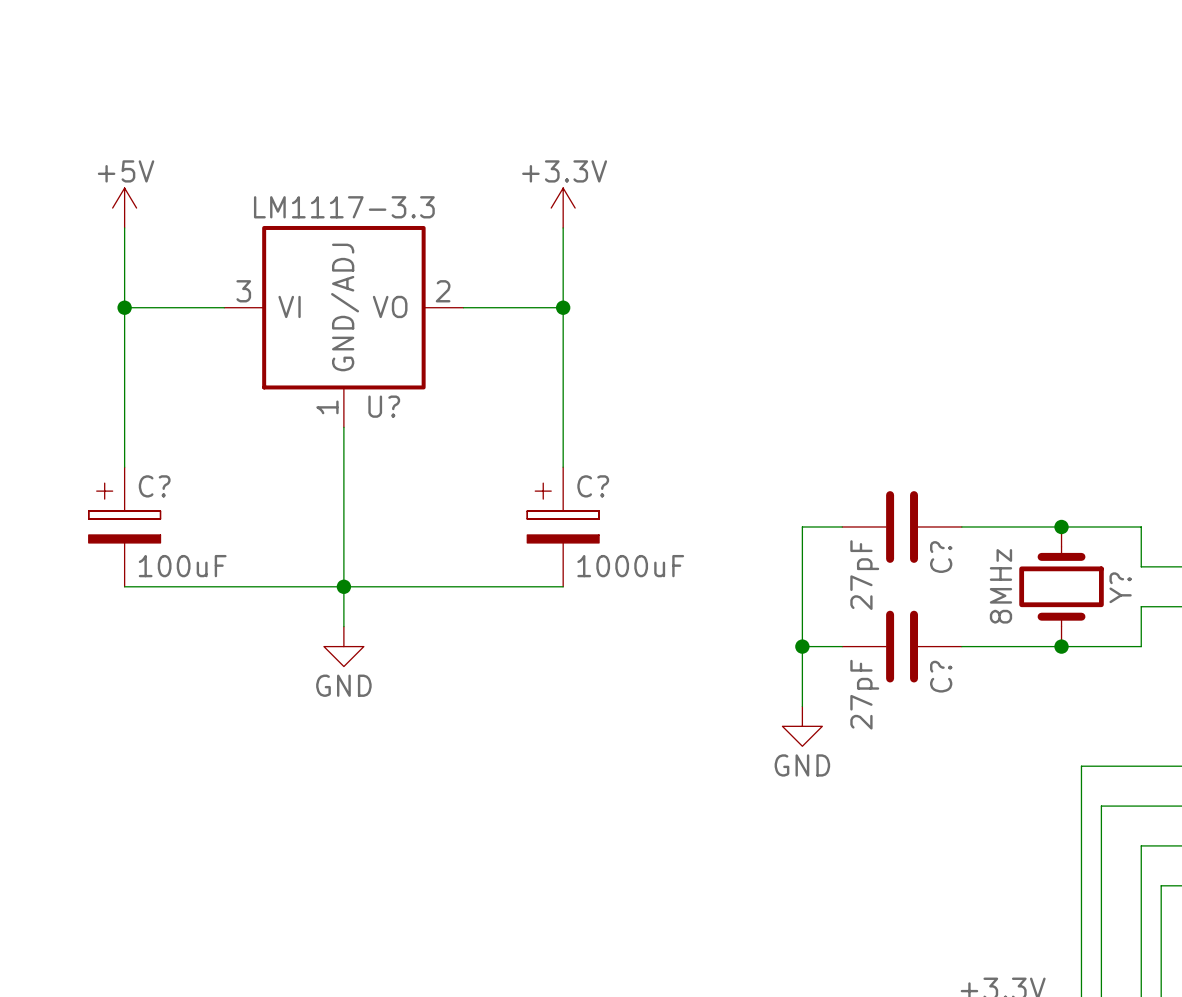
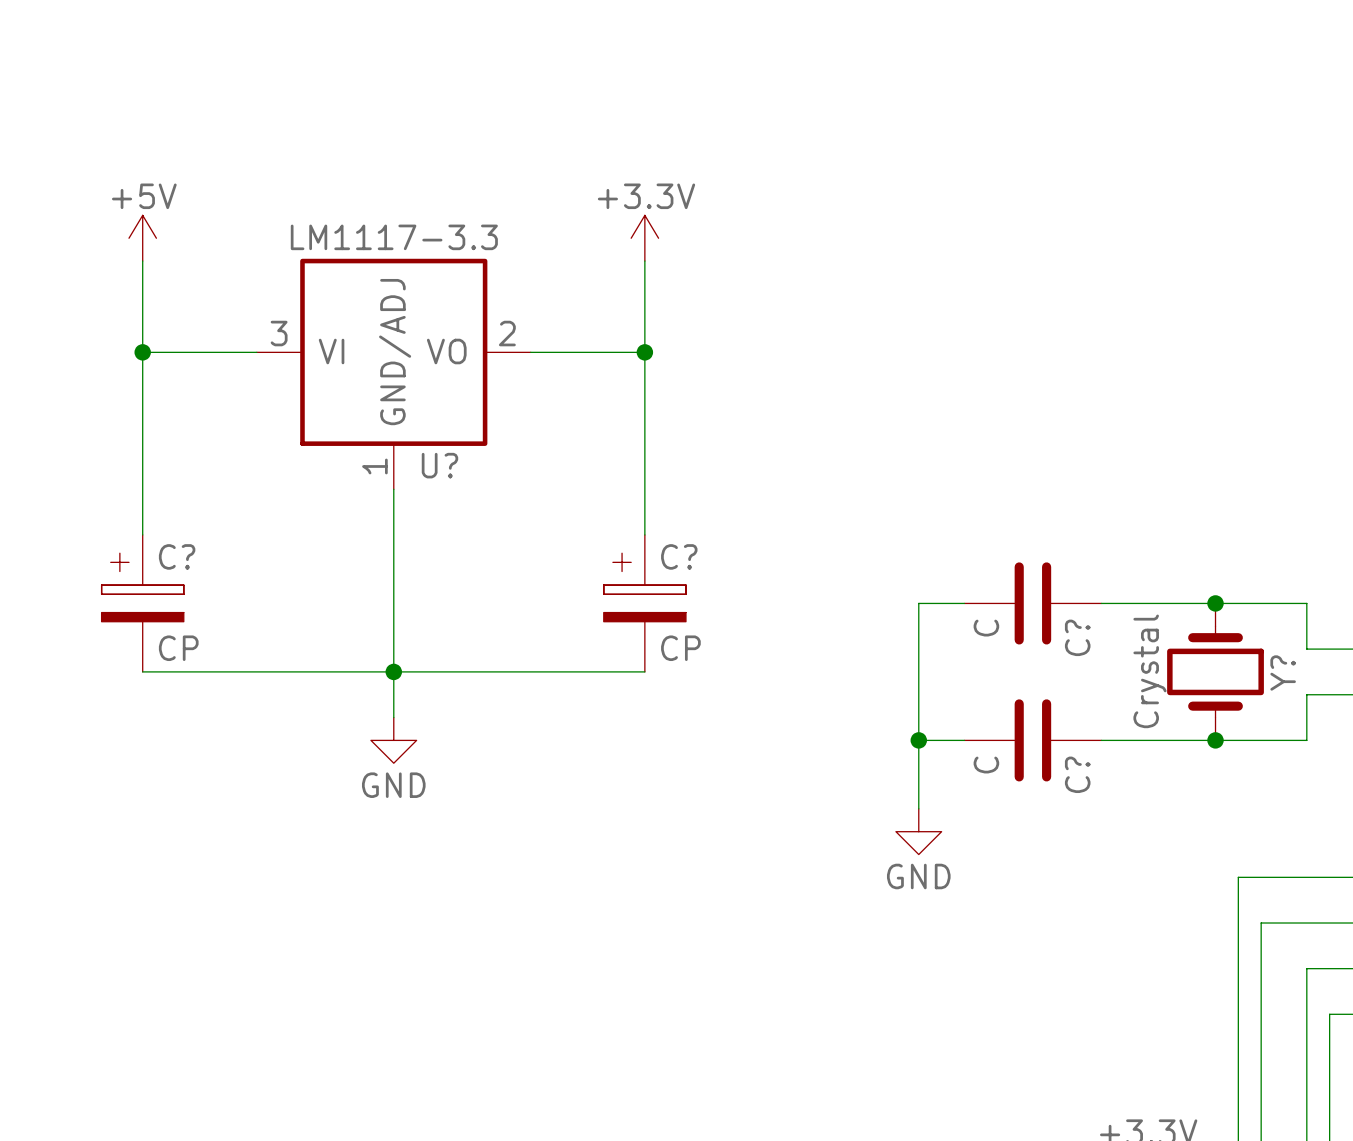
C? value: 100uF (182, 566) -> CP (178, 648)
C? value: 1000uF (630, 566) -> CP (680, 648)
C? value: 27pF (864, 575) -> C (986, 628)
Y? value: 8MHz (1000, 586) -> Crystal (1149, 671)
C? value: 27pF (864, 694) -> C (986, 765)

